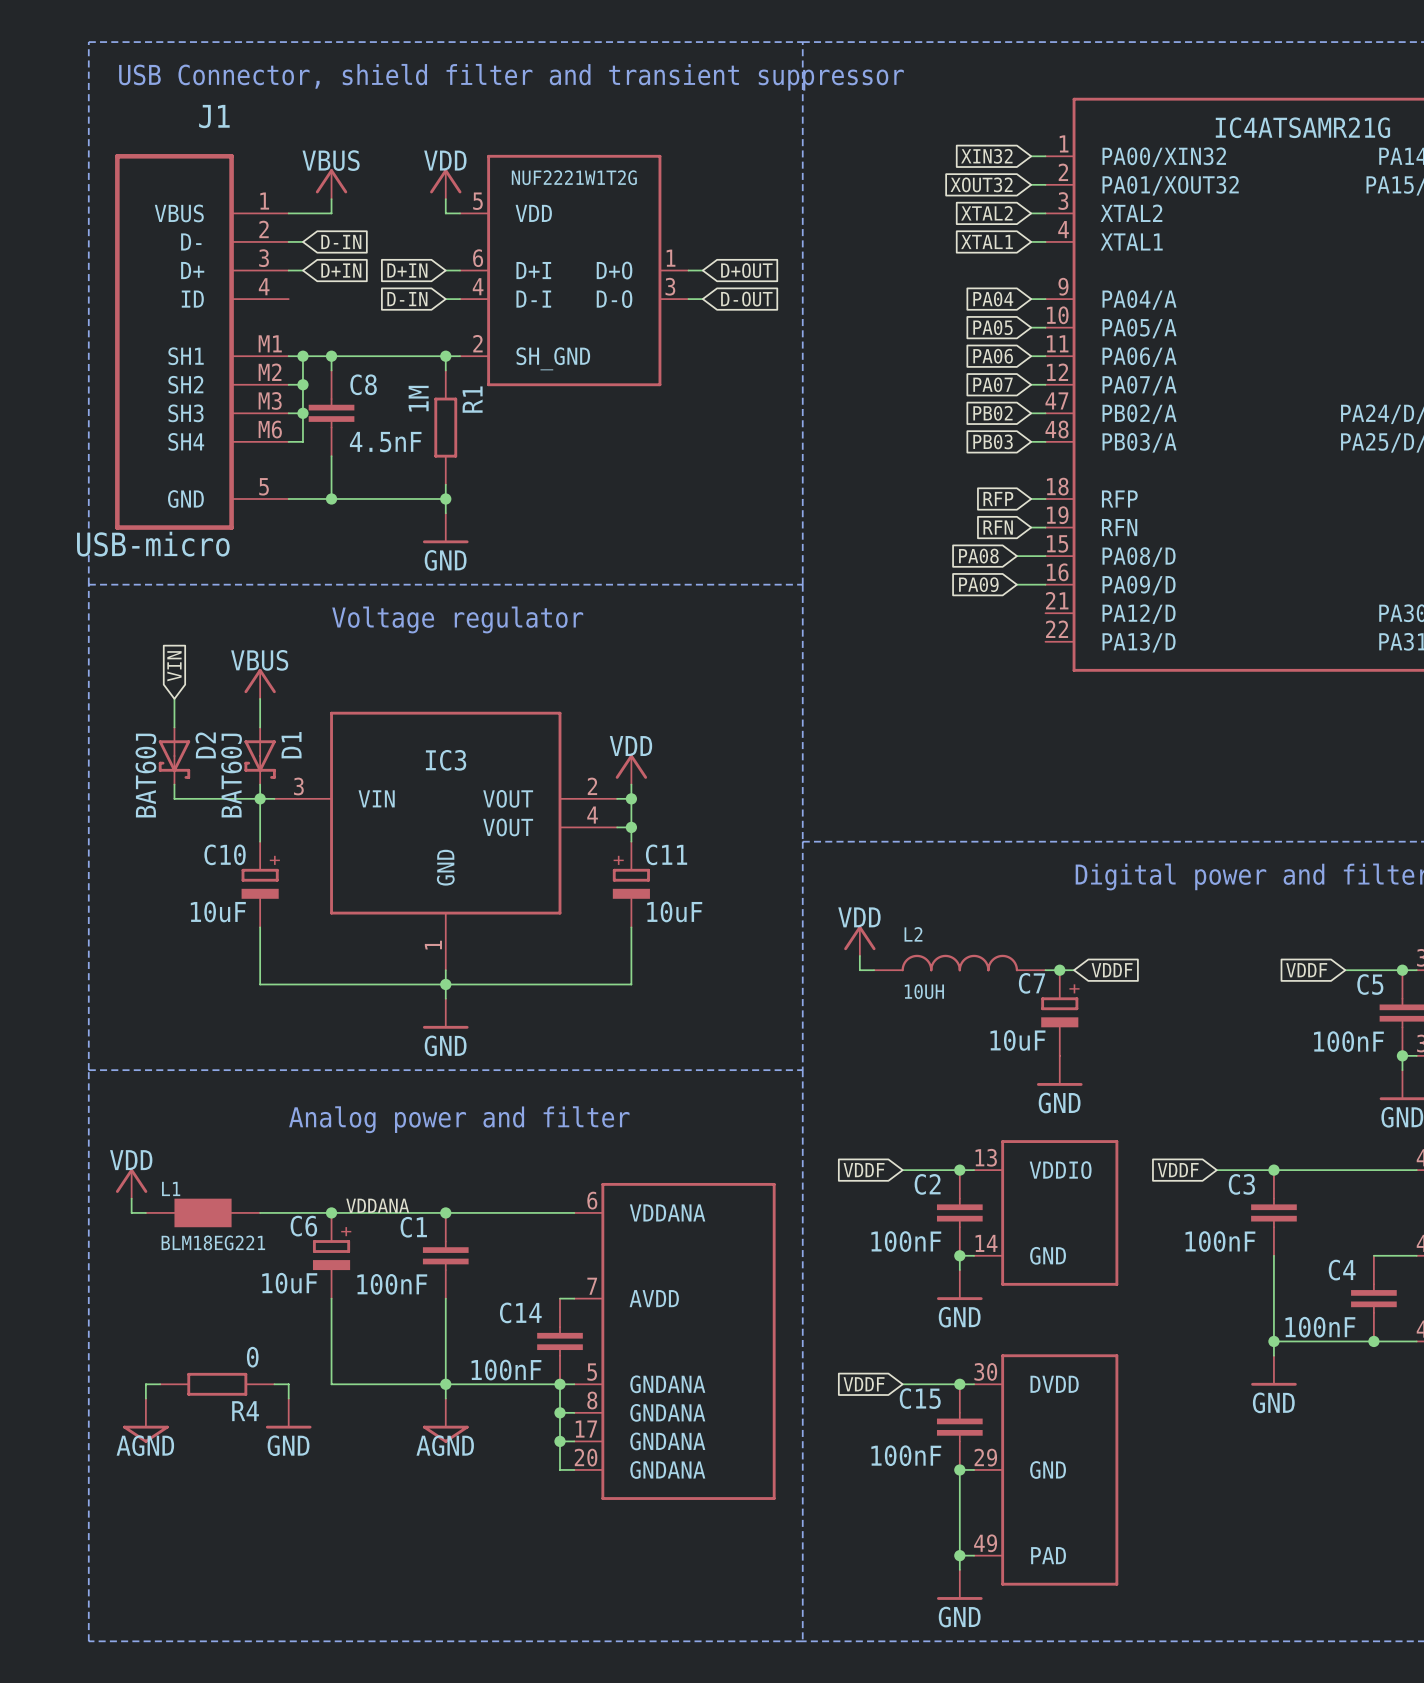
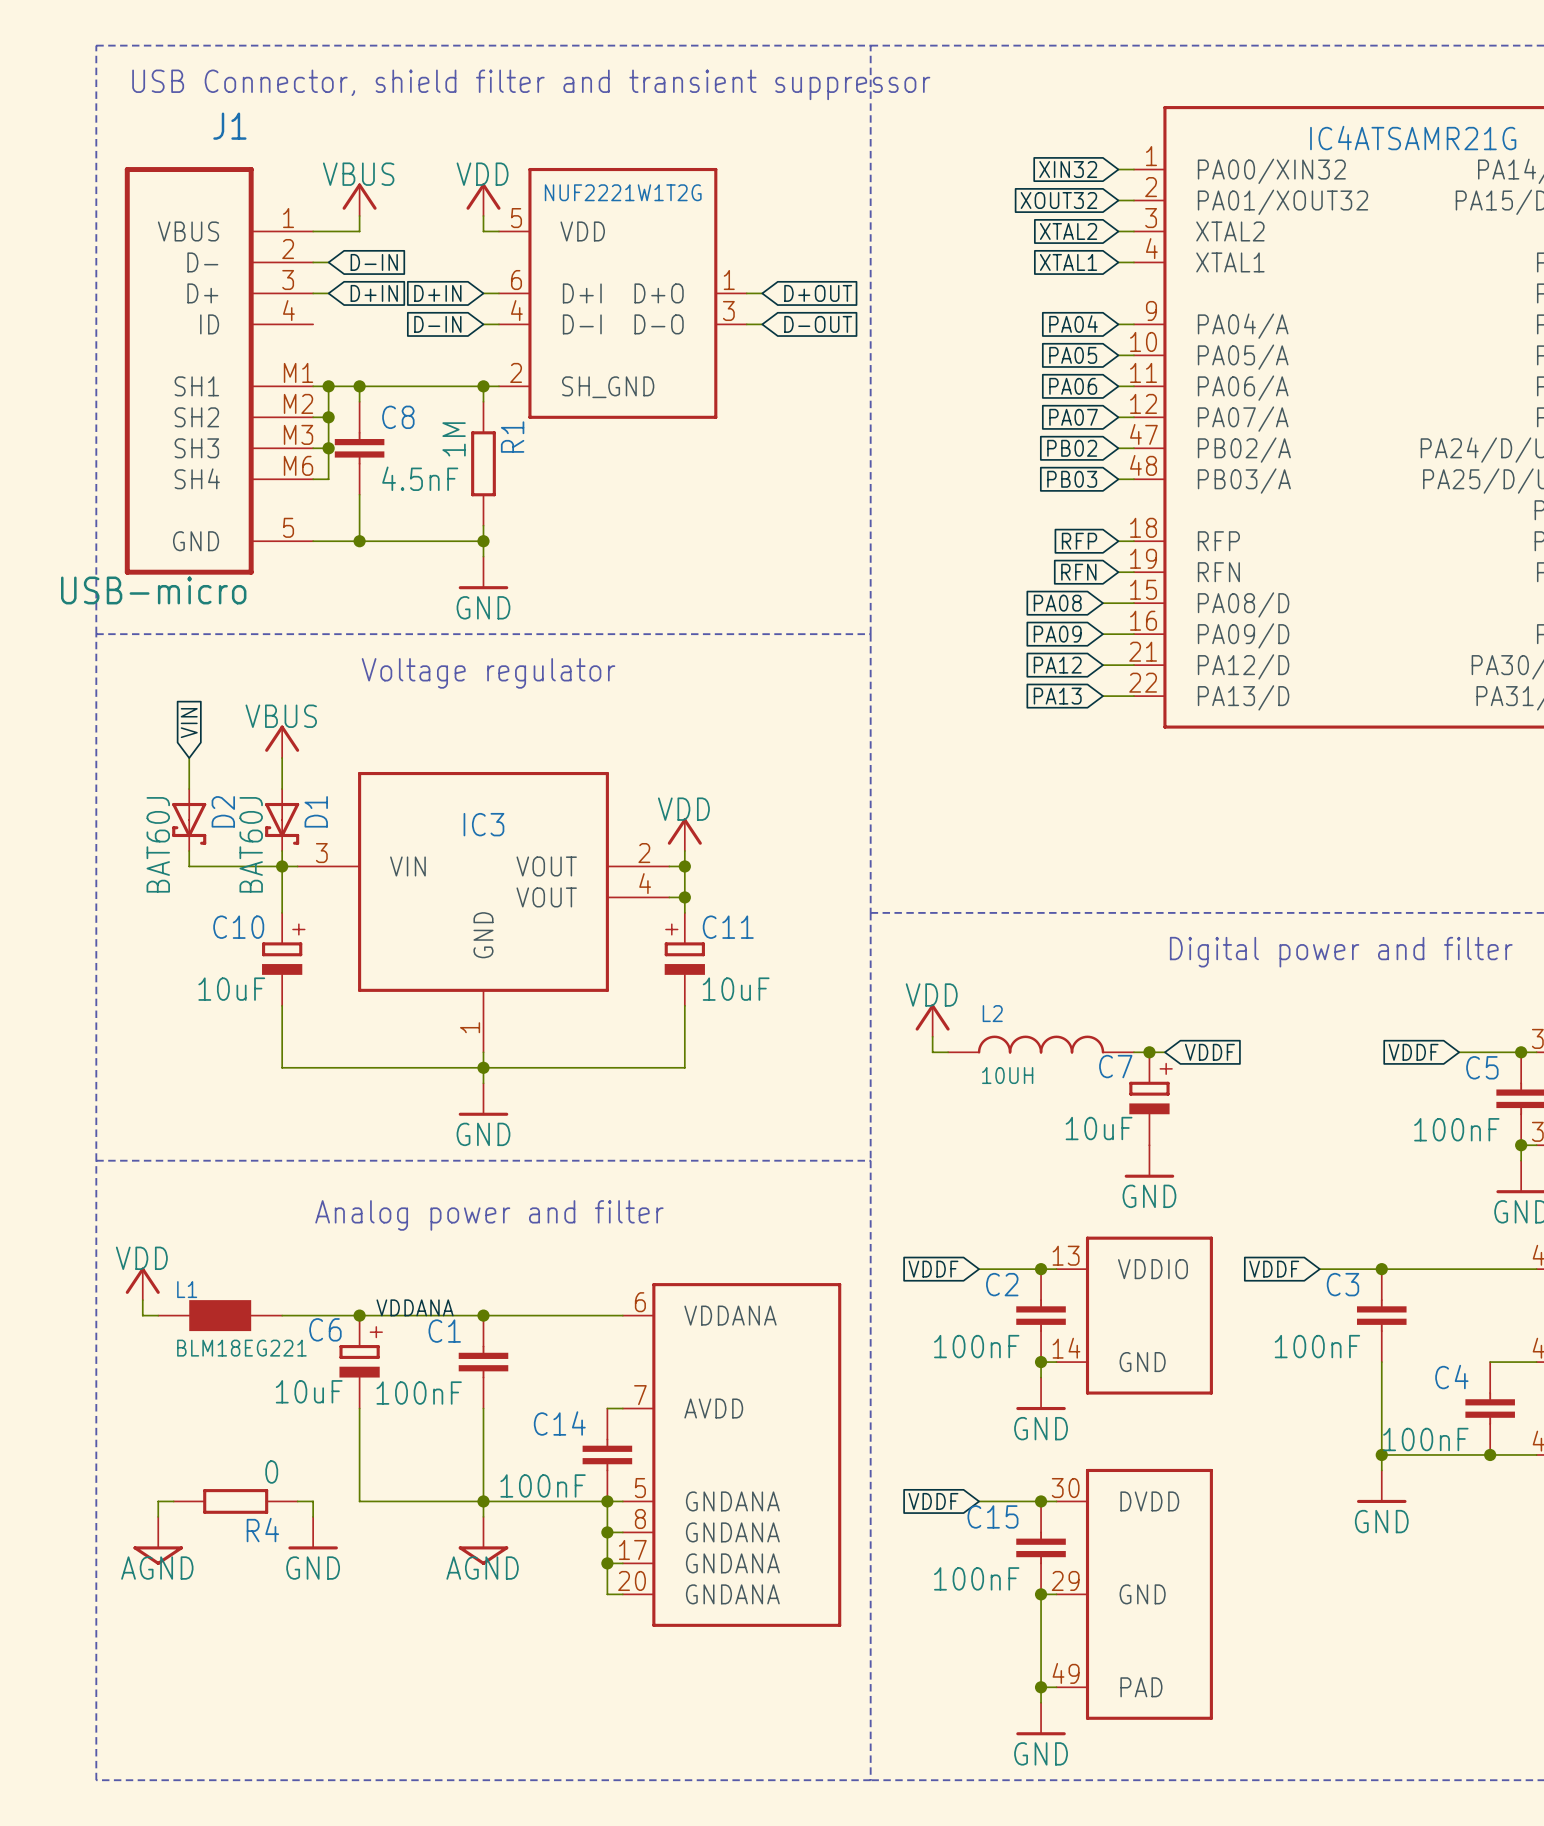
global label: none -> PA12 (1057, 665)
wire: none -> (1102, 665) (1133, 665)
global label: none -> PA13 (1057, 696)
wire: none -> (1102, 696) (1133, 696)

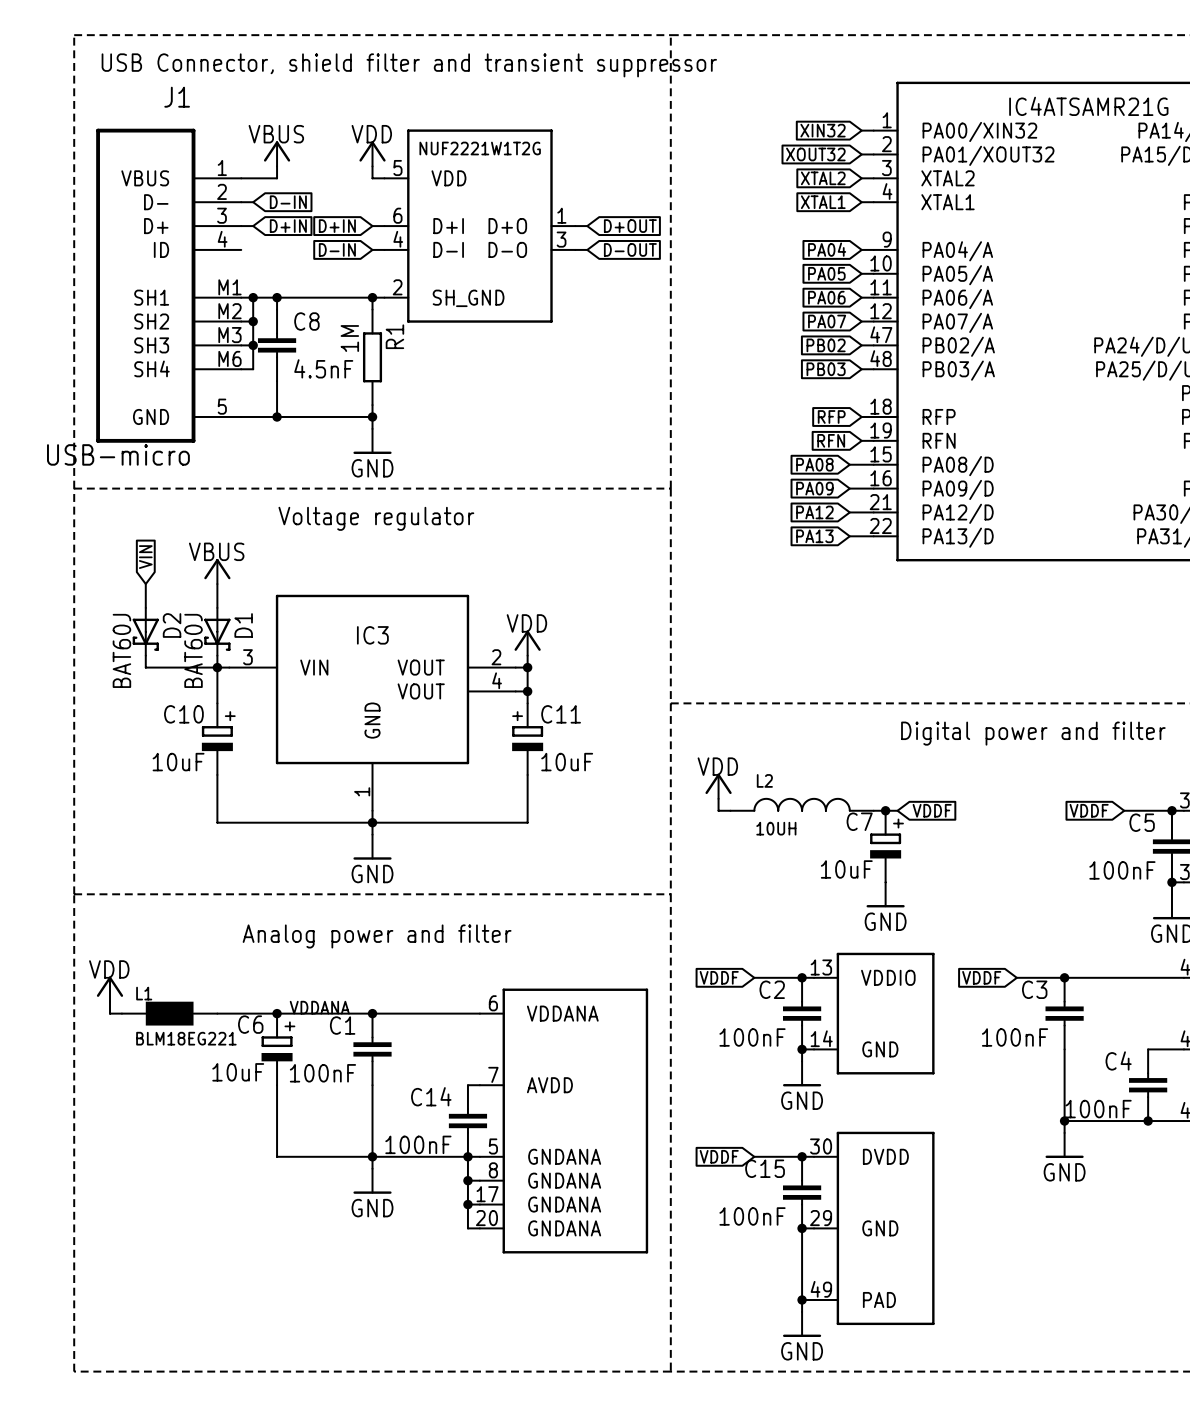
wire: (173, 1501) (158, 1501) (158, 1516) -> none
R4: 0 (235, 1501) -> none
wire: (297, 1501) (313, 1501) (313, 1516) -> none
power symbol: GND (313, 1533) -> none
power symbol: AGND (158, 1540) -> none
power symbol: AGND (483, 1540) -> GND (372, 1181)

